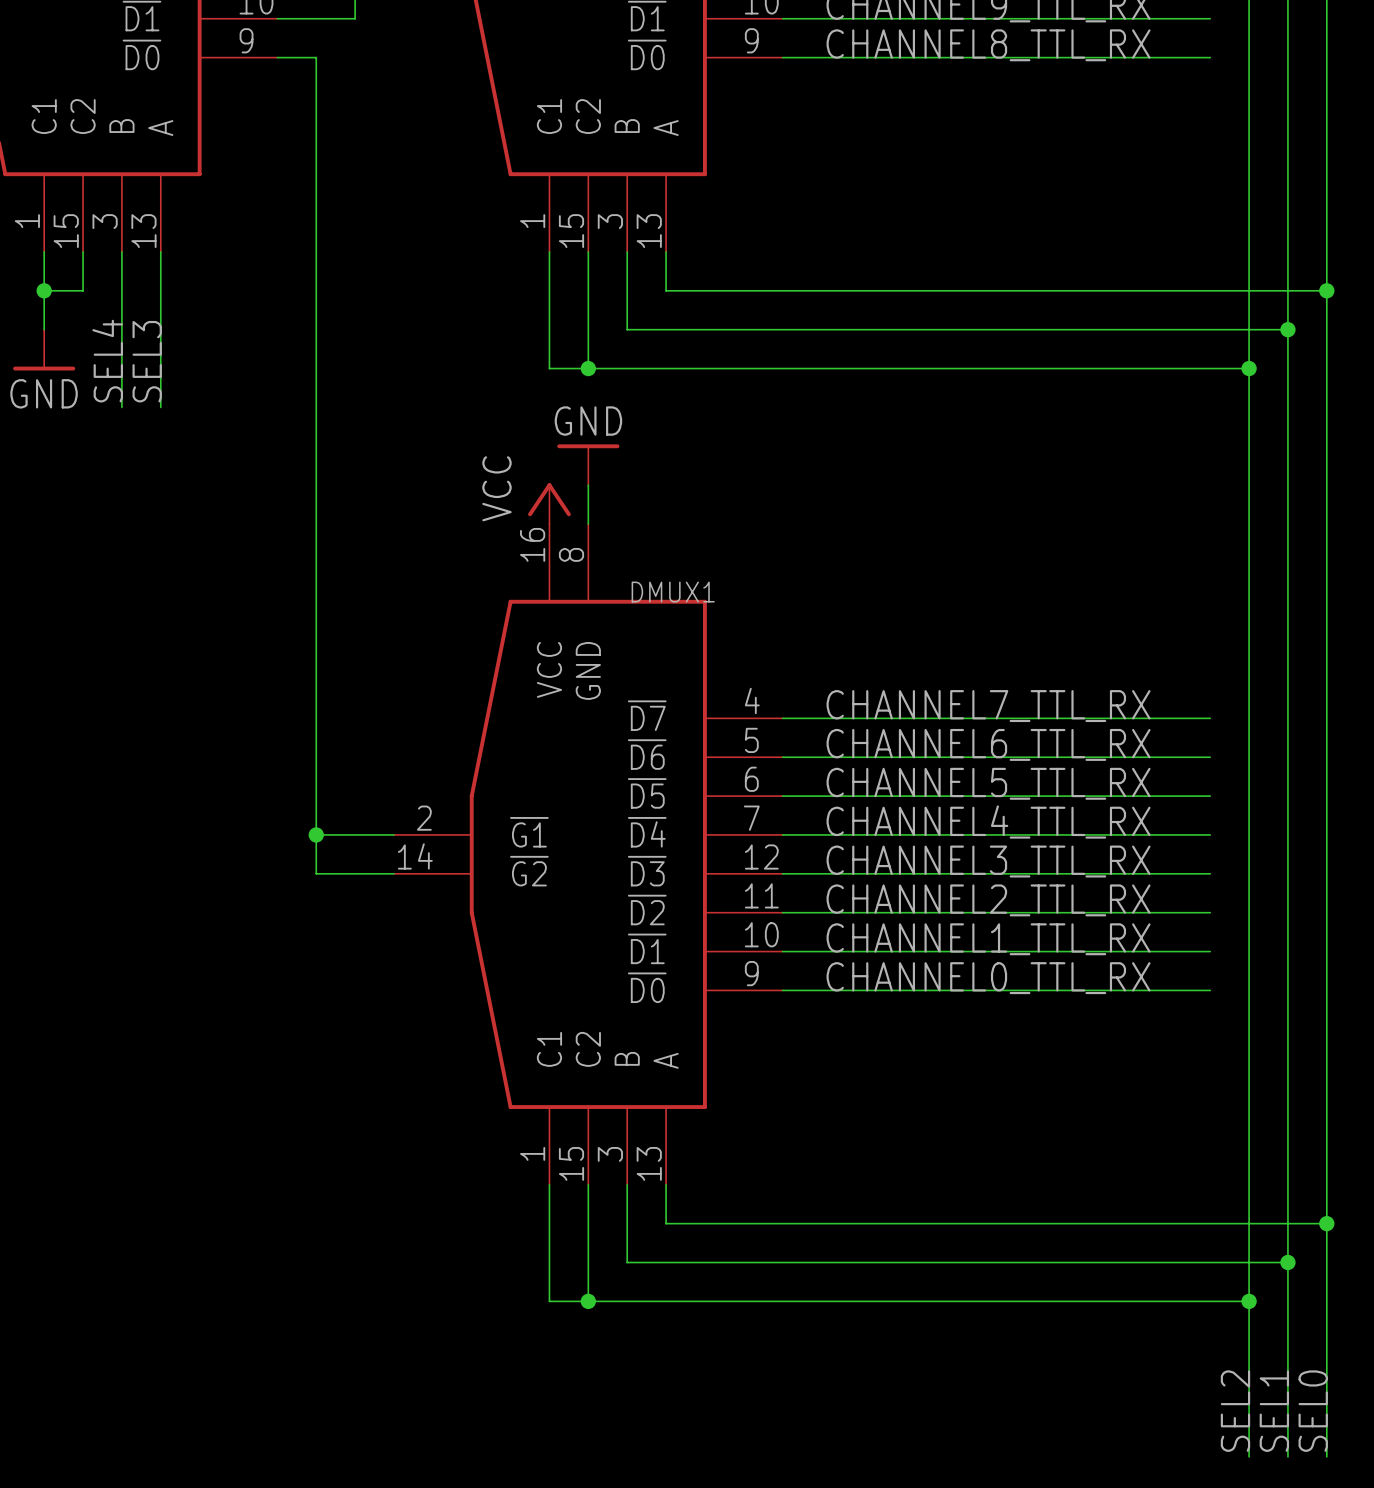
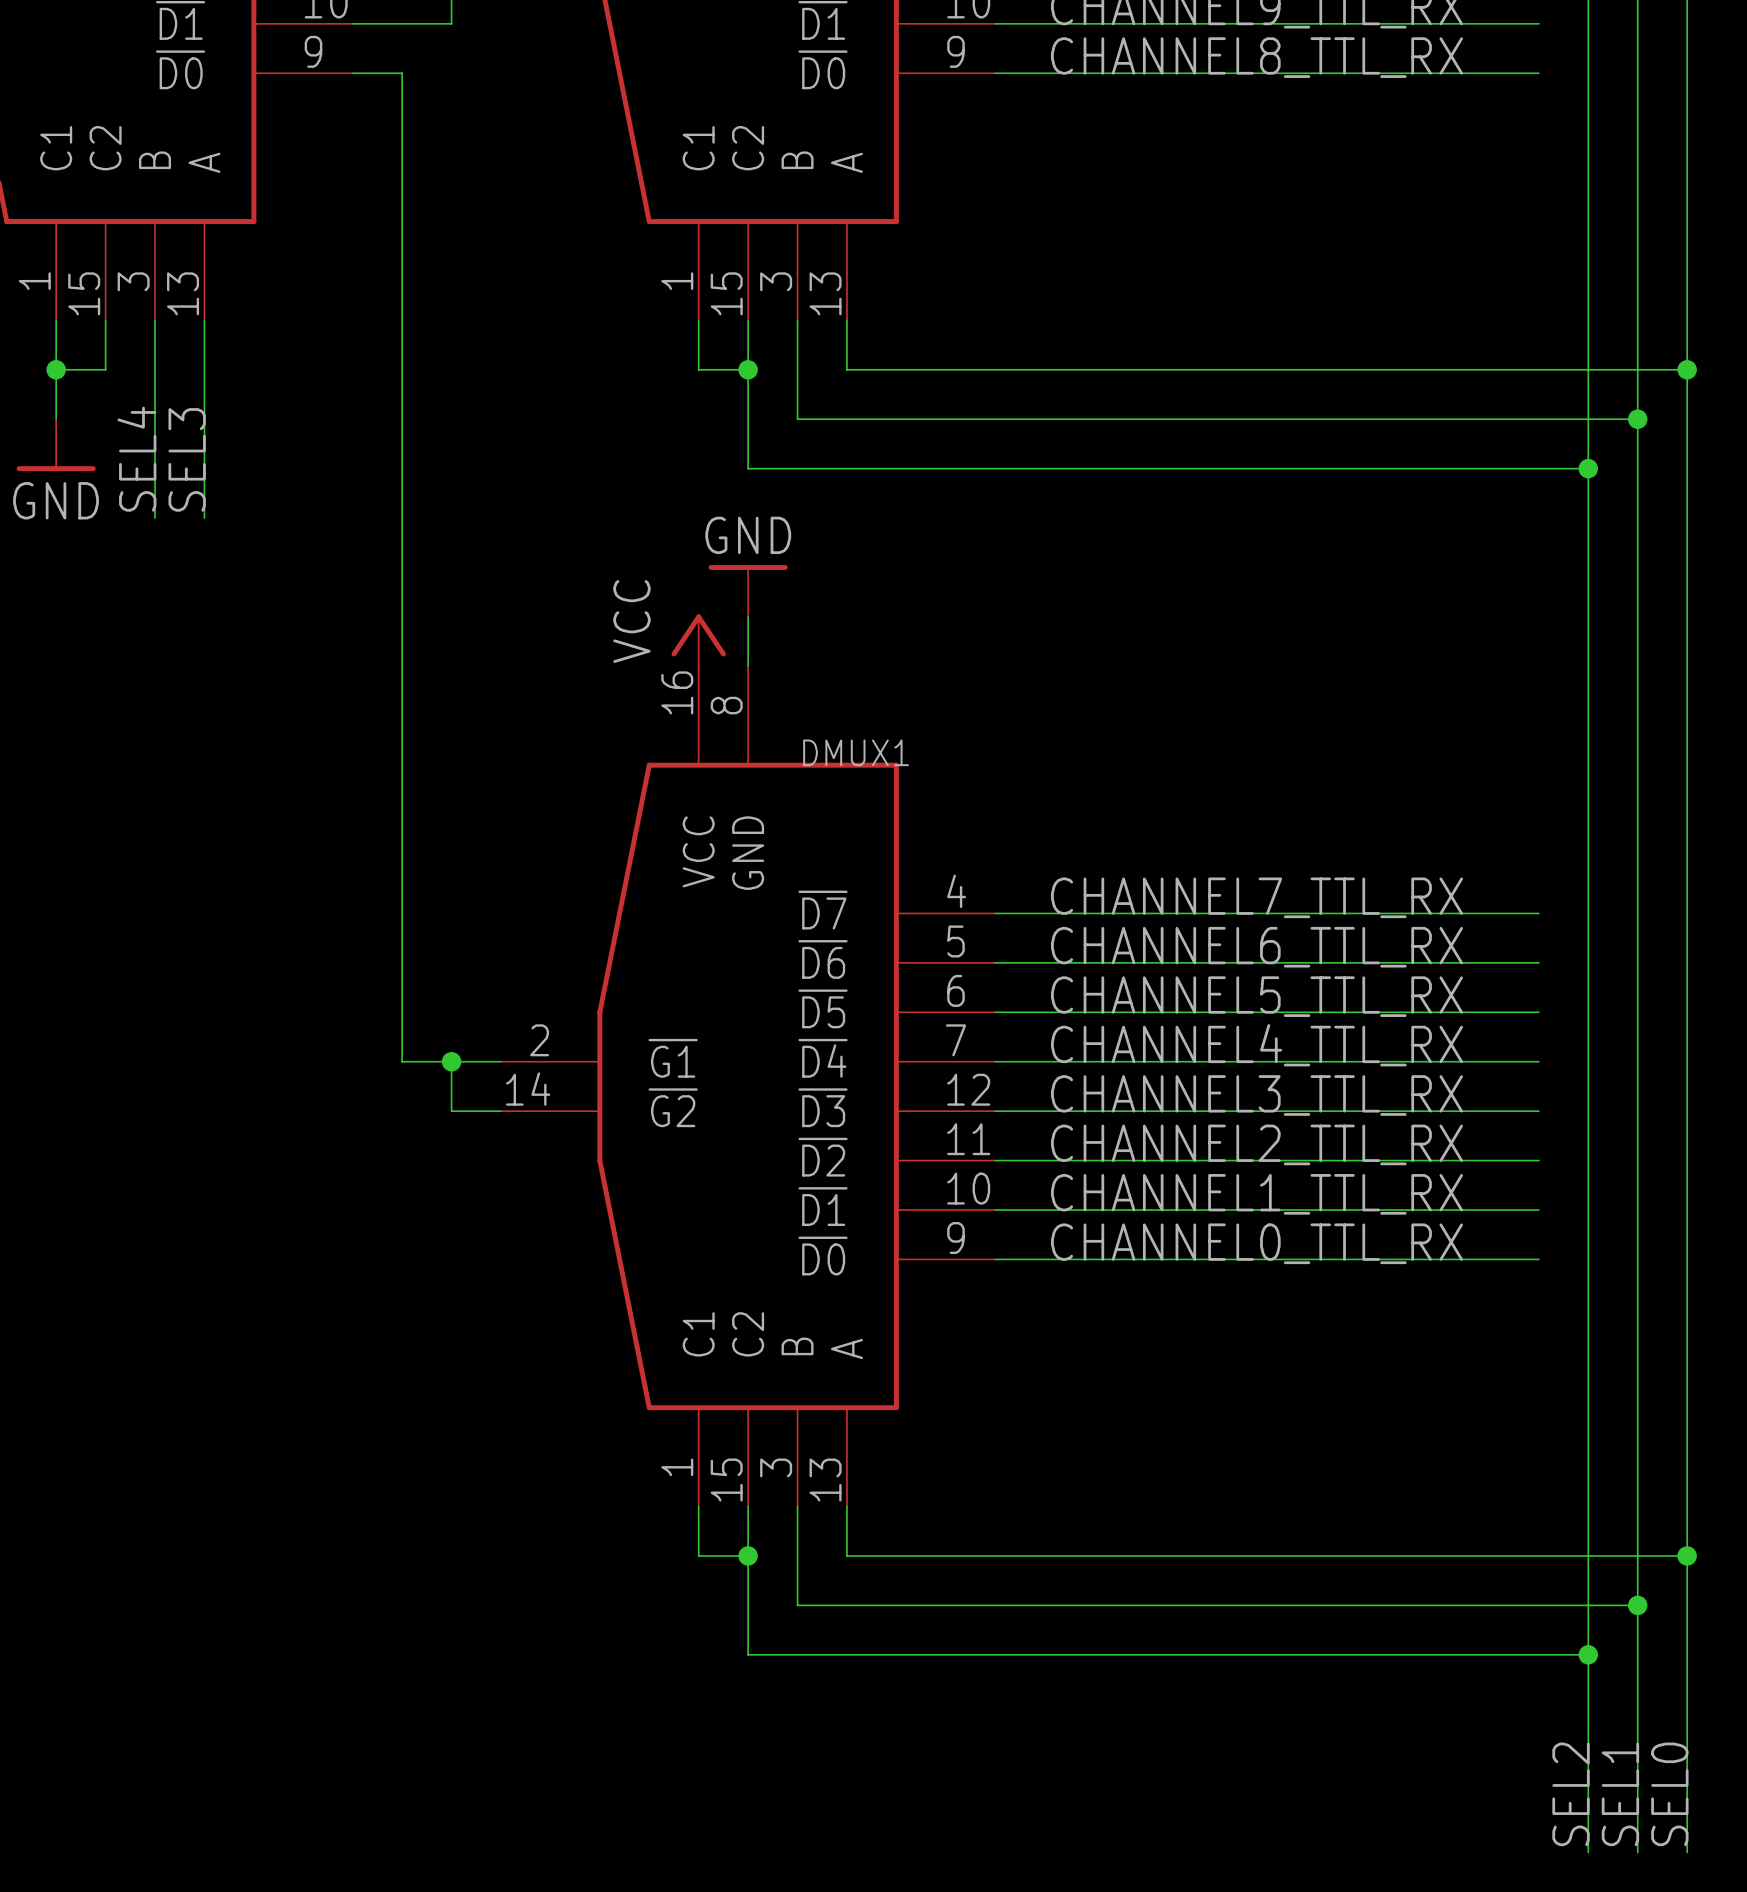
wire: (549, 290) (549, 368) (588, 368) -> (698, 369) (748, 369)
junction position: (588, 368) -> (748, 369)
wire: (316, 834) (316, 873) (355, 873) -> (451, 1061) (451, 1111)
junction position: (316, 834) -> (451, 1061)
wire: (549, 1223) (549, 1301) (588, 1301) -> (698, 1555) (748, 1555)
junction position: (588, 1301) -> (748, 1555)

